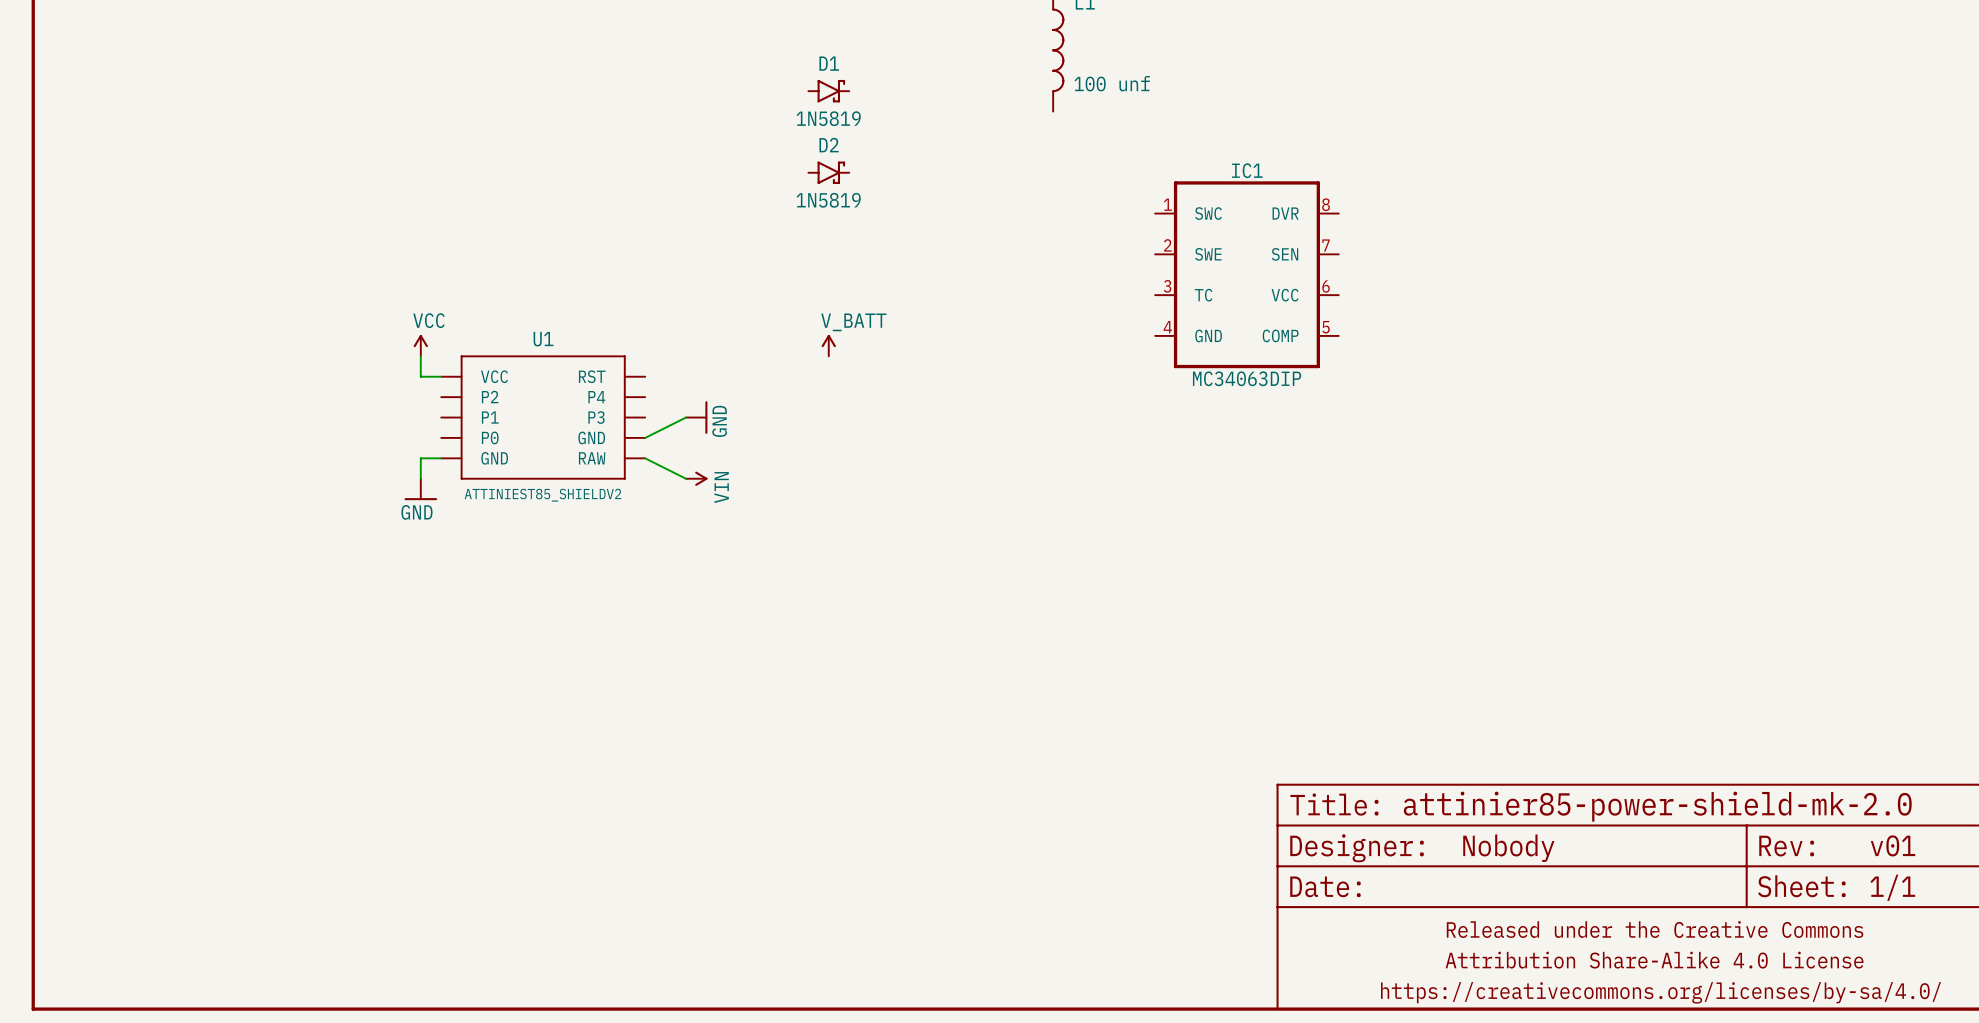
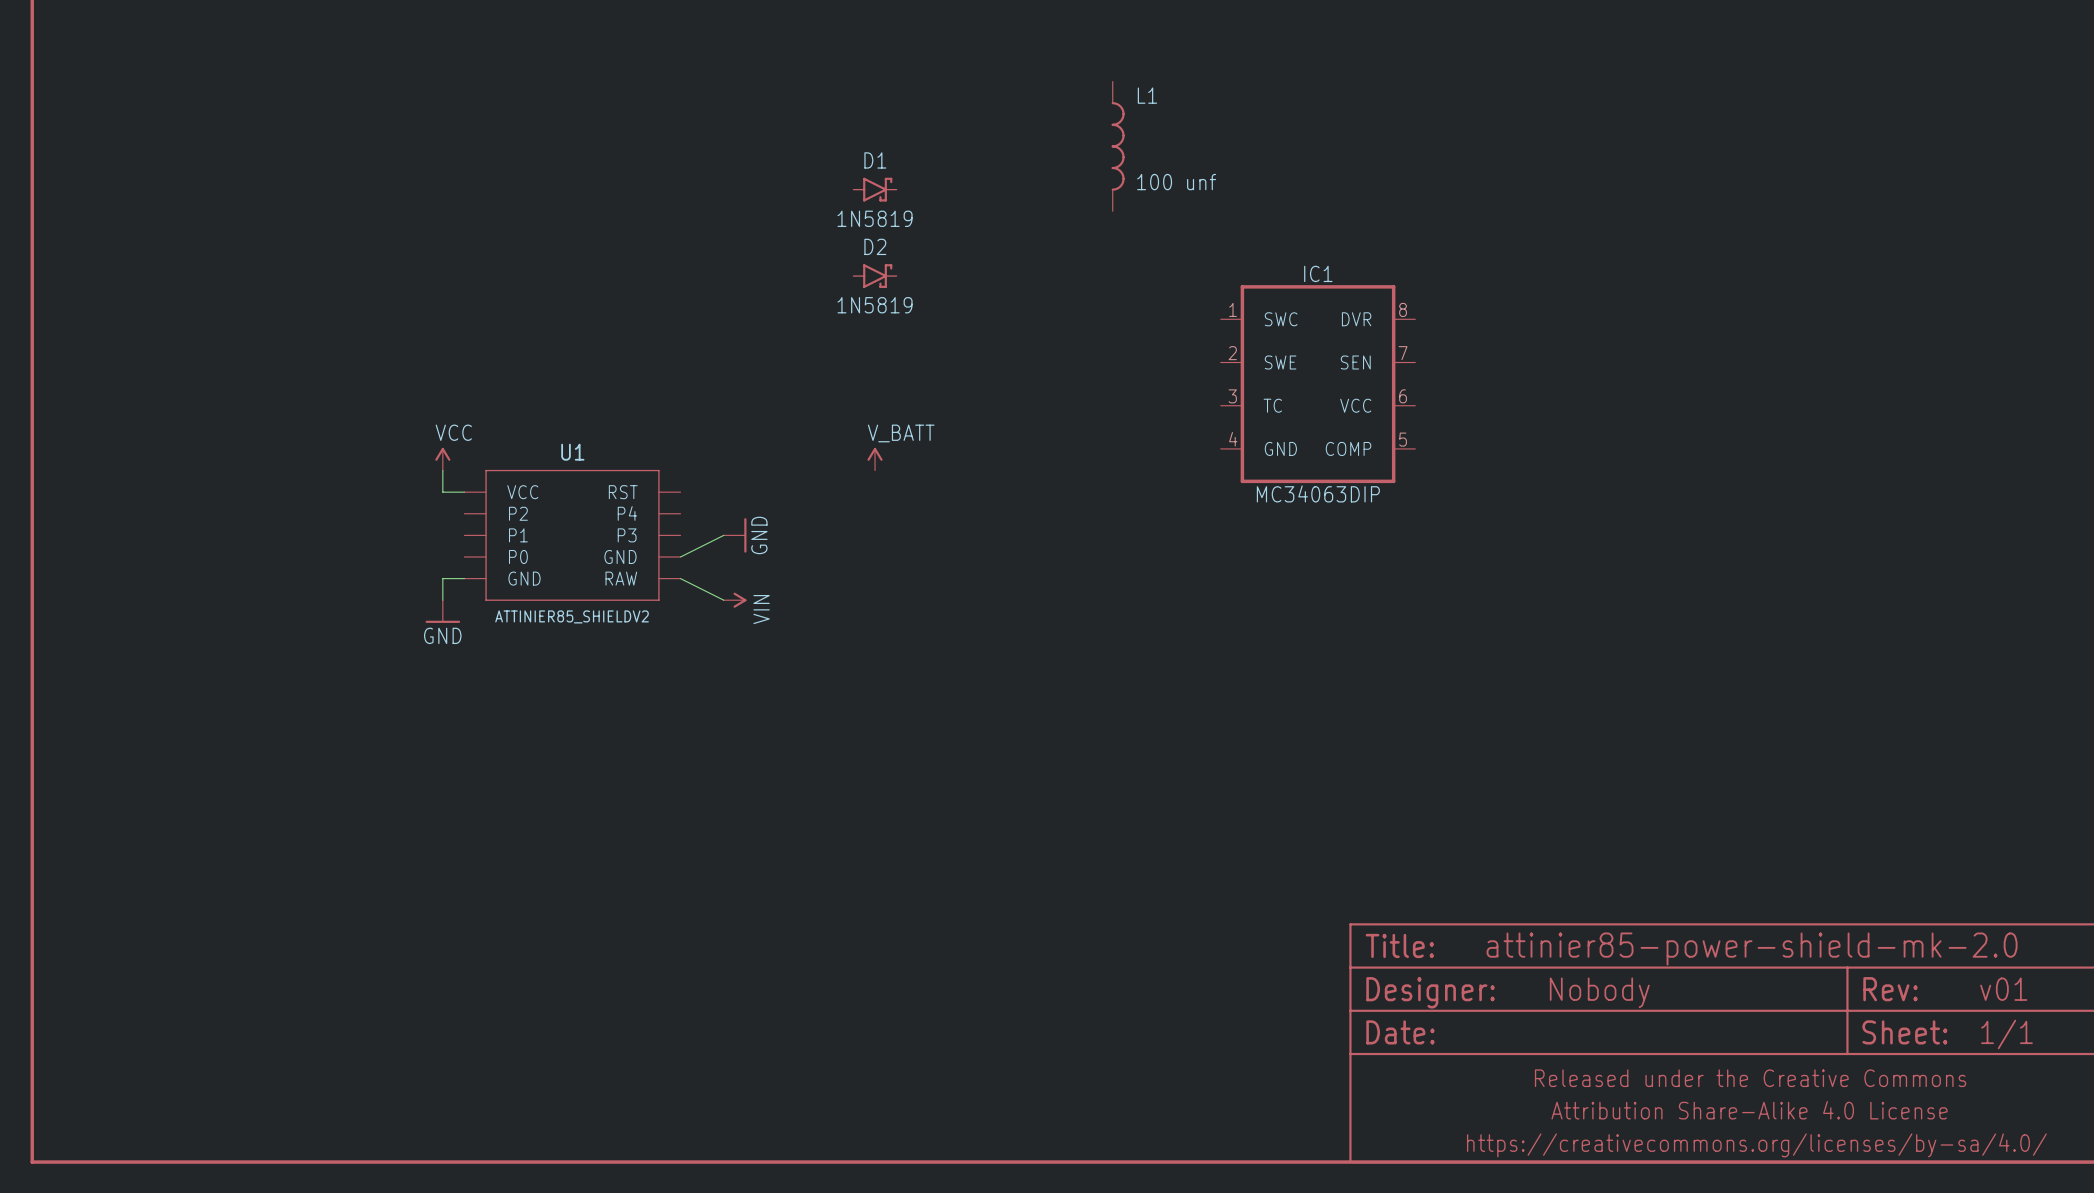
U1 value: ATTINIEST85_SHIELDV2 (542, 495) -> ATTINIER85_SHIELDV2 (572, 616)

